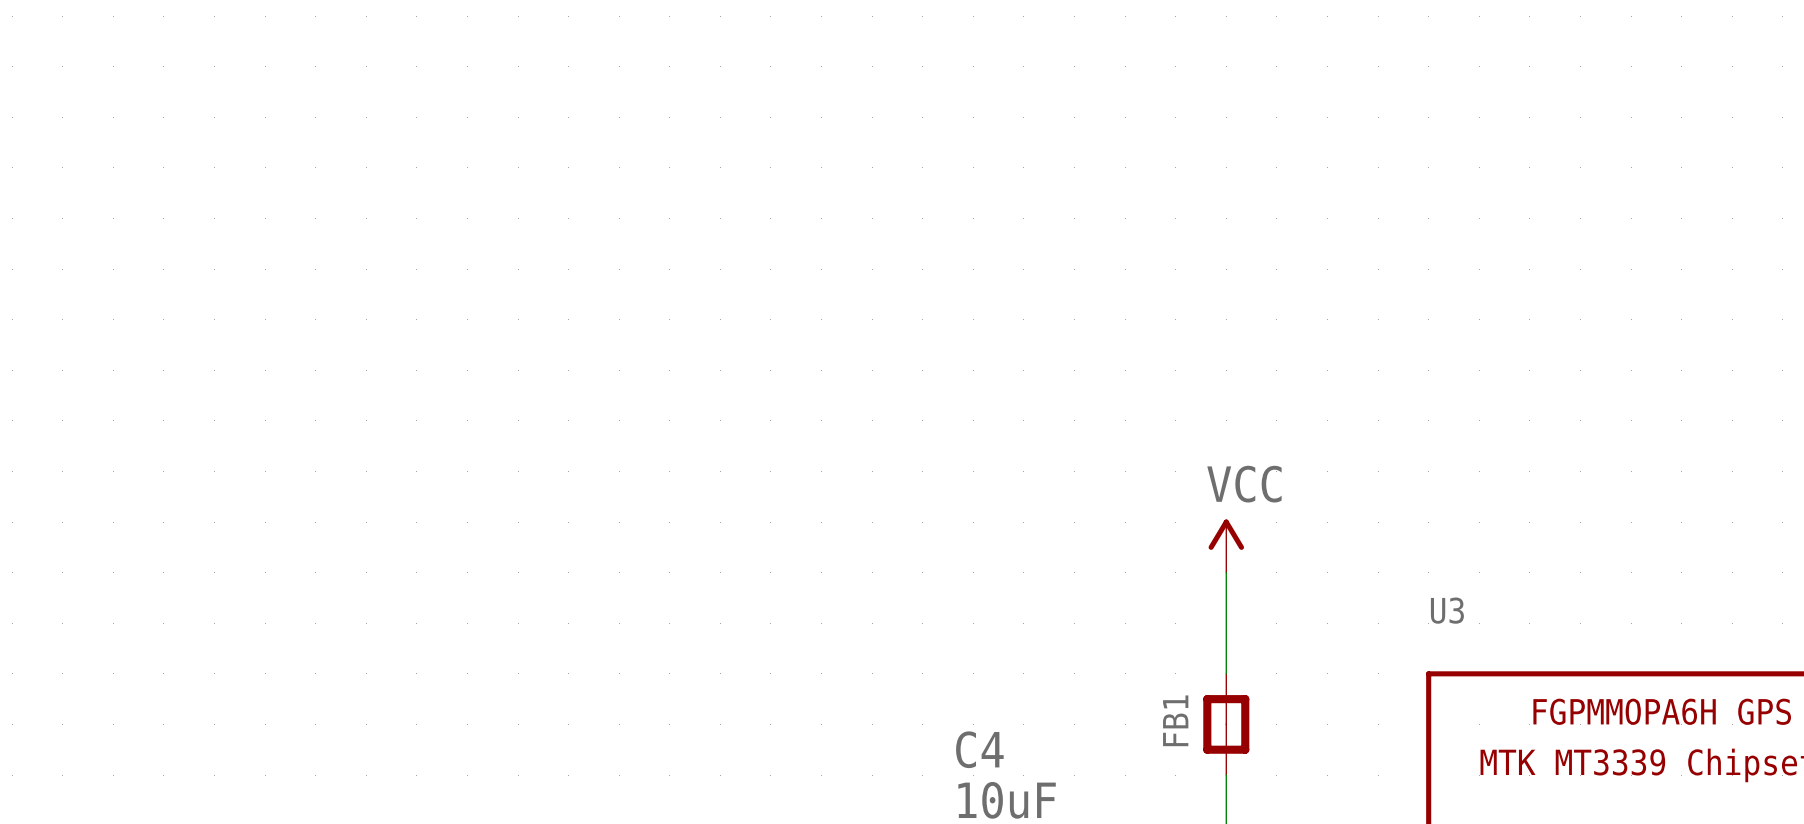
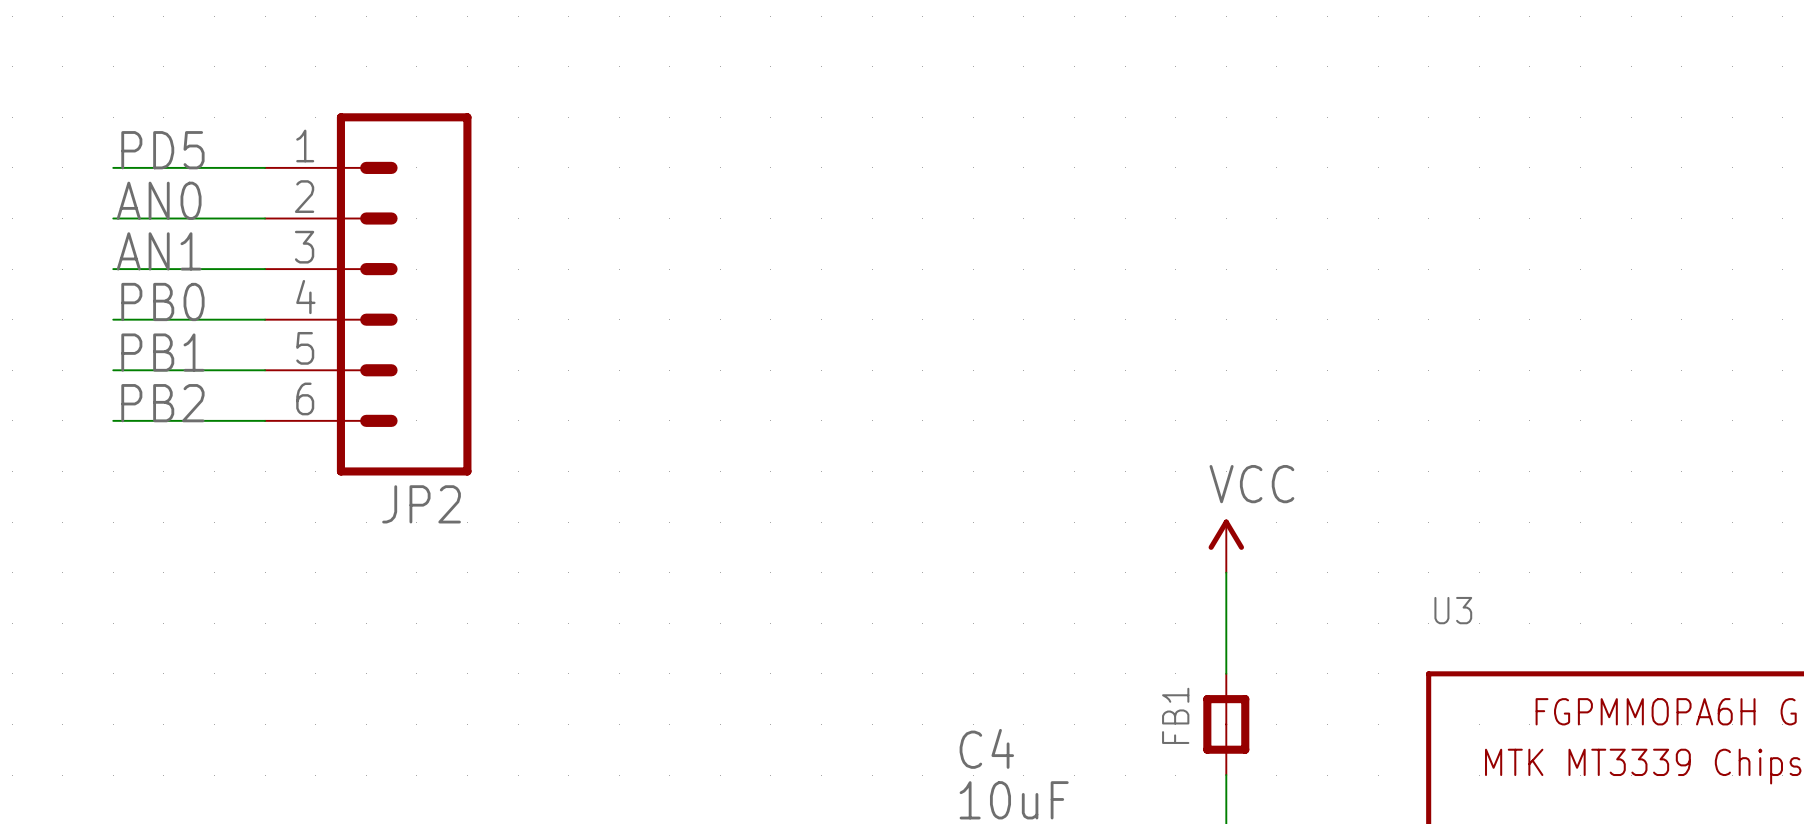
label: none -> PD5 (162, 150)
wire: none -> (113, 167) (265, 167)
label: none -> AN0 (159, 200)
wire: none -> (113, 218) (265, 218)
label: none -> AN1 (159, 251)
wire: none -> (113, 269) (265, 269)
JP2: none -> (368, 294)
label: none -> PB0 (162, 301)
wire: none -> (113, 319) (265, 319)
label: none -> PB1 (162, 352)
wire: none -> (113, 370) (265, 370)
label: none -> PB2 (162, 403)
wire: none -> (113, 420) (265, 420)

